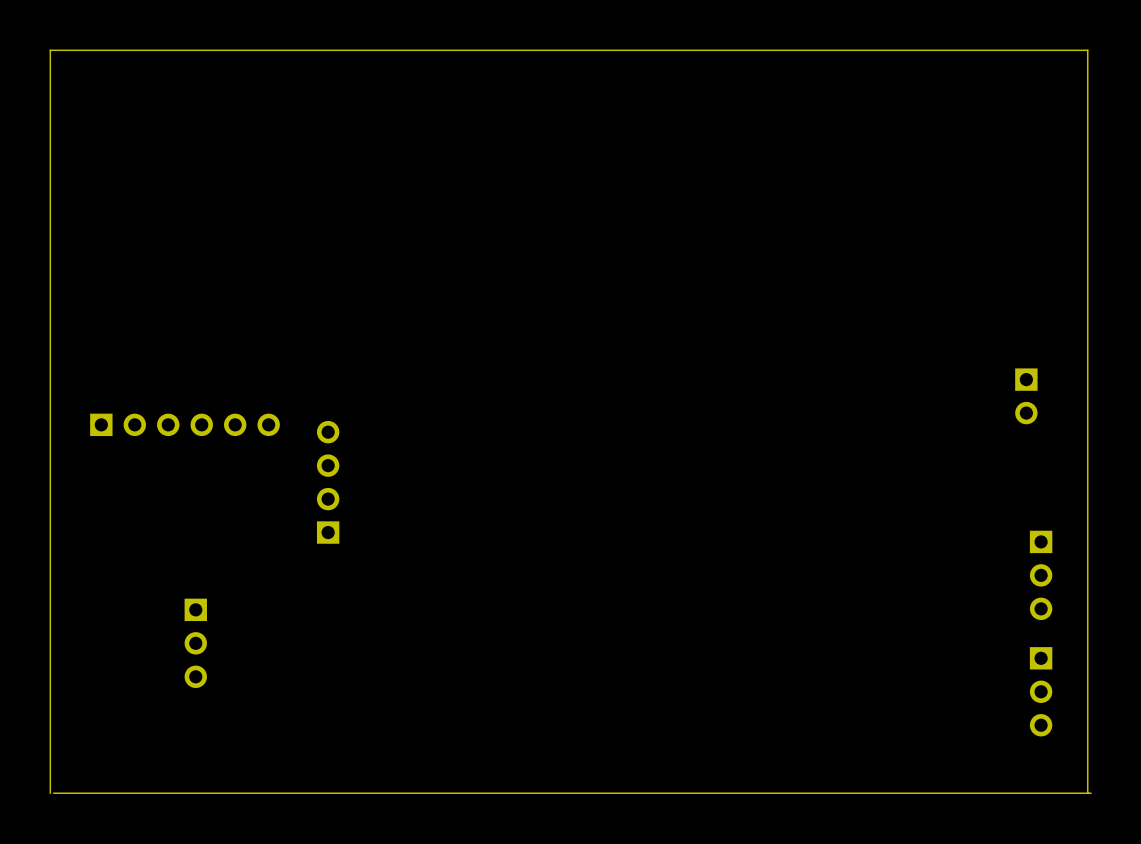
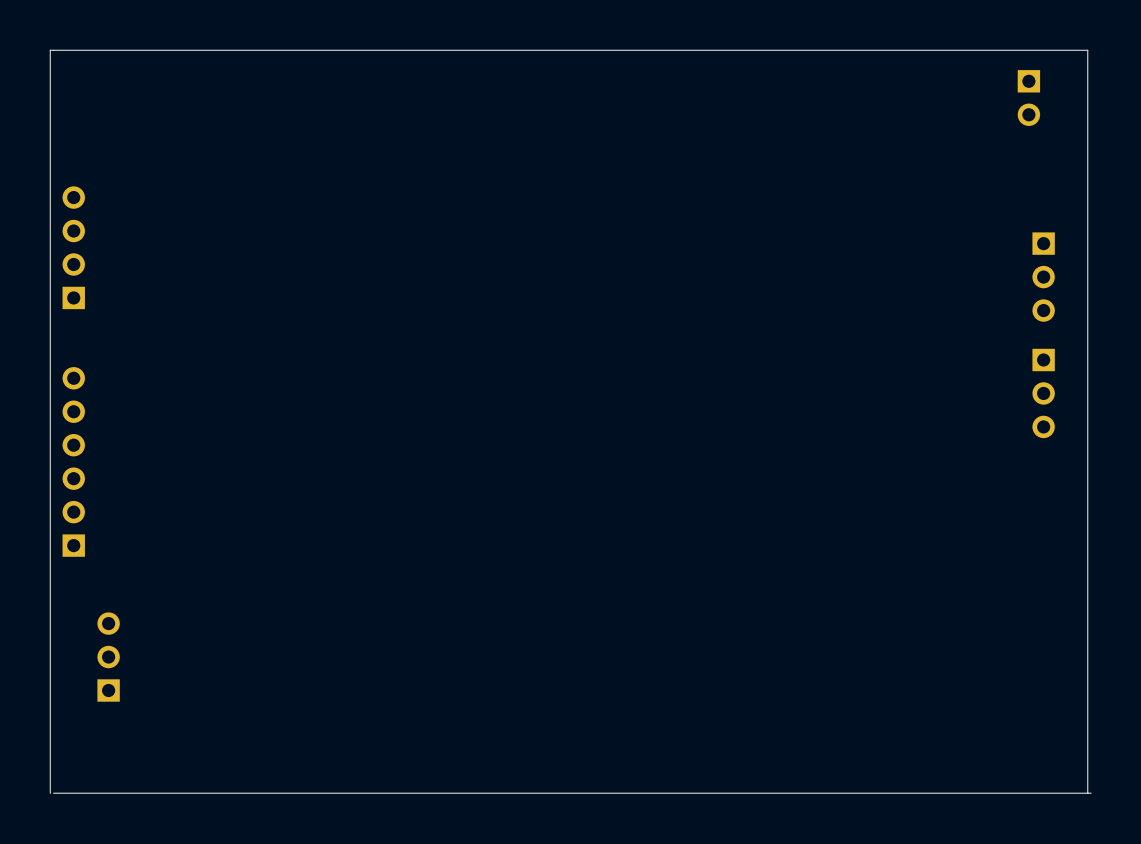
part: none -> (73, 247)
part: none -> (1043, 277)
part: none -> (1043, 393)
part position: (1026, 396) -> (1028, 98)
part rotation: 0° (185, 424) -> 90° counterclockwise (73, 461)
part position: (185, 424) -> (73, 461)
part: (328, 482) -> none
part: (1041, 575) -> none
part rotation: 0° (195, 643) -> 180° (108, 657)
part position: (195, 643) -> (108, 657)
part: (1041, 691) -> none

